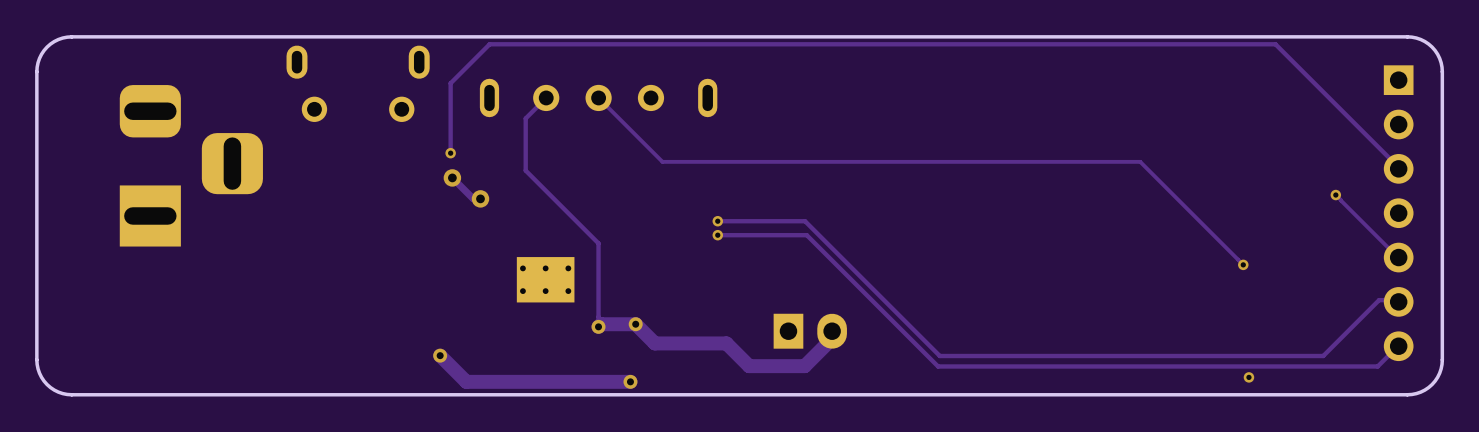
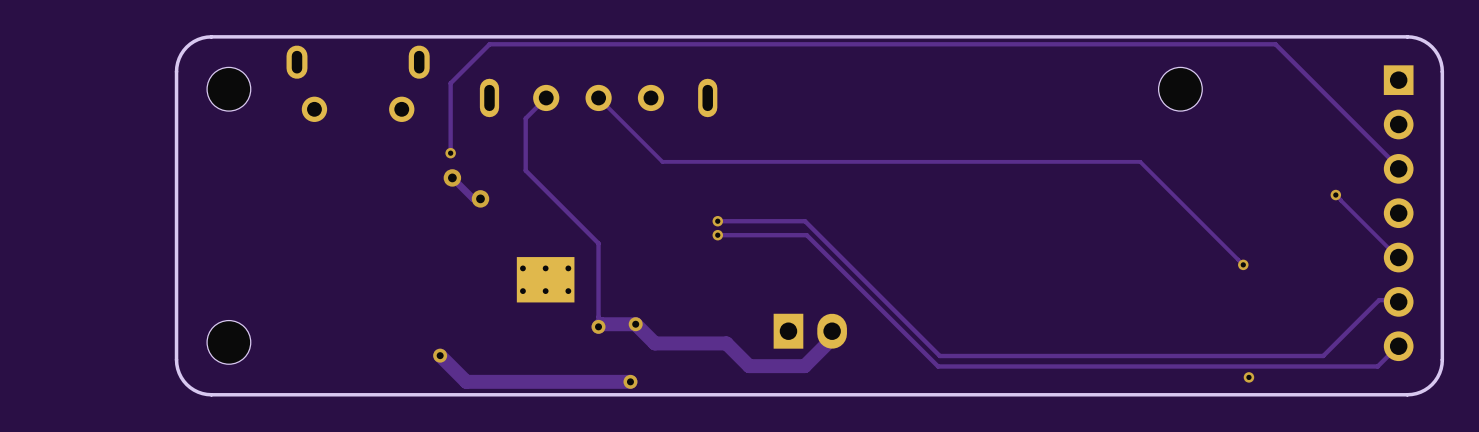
board edge: (211, 36) (62, 38) (54, 41) (44, 50) (38, 62) (36, 71) (36, 359) (41, 377) (54, 390) (67, 394) (211, 394) -> (211, 36) (198, 39) (186, 47) (179, 58) (176, 71) (176, 364) (179, 373) (186, 384) (198, 392) (211, 394)
part: none -> (228, 89)
part: none -> (1180, 89)
part: (191, 165) -> none
part: none -> (228, 342)

